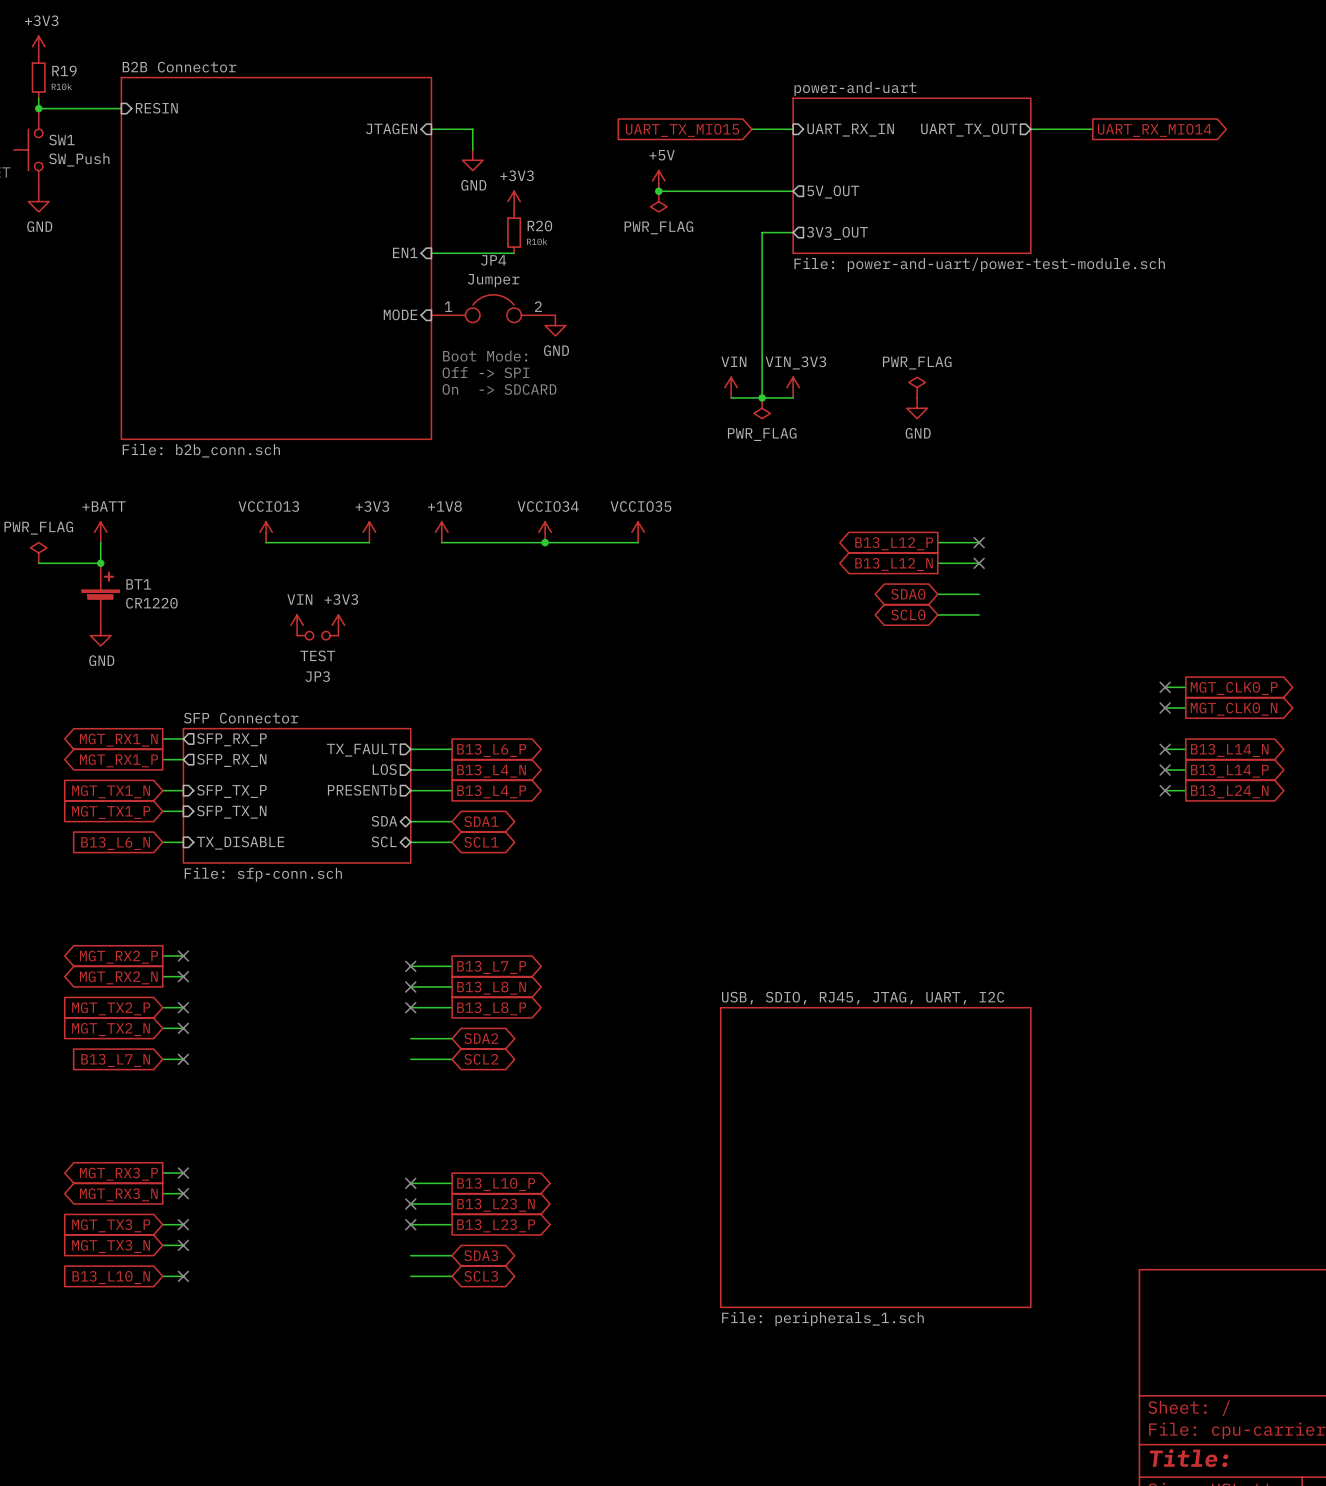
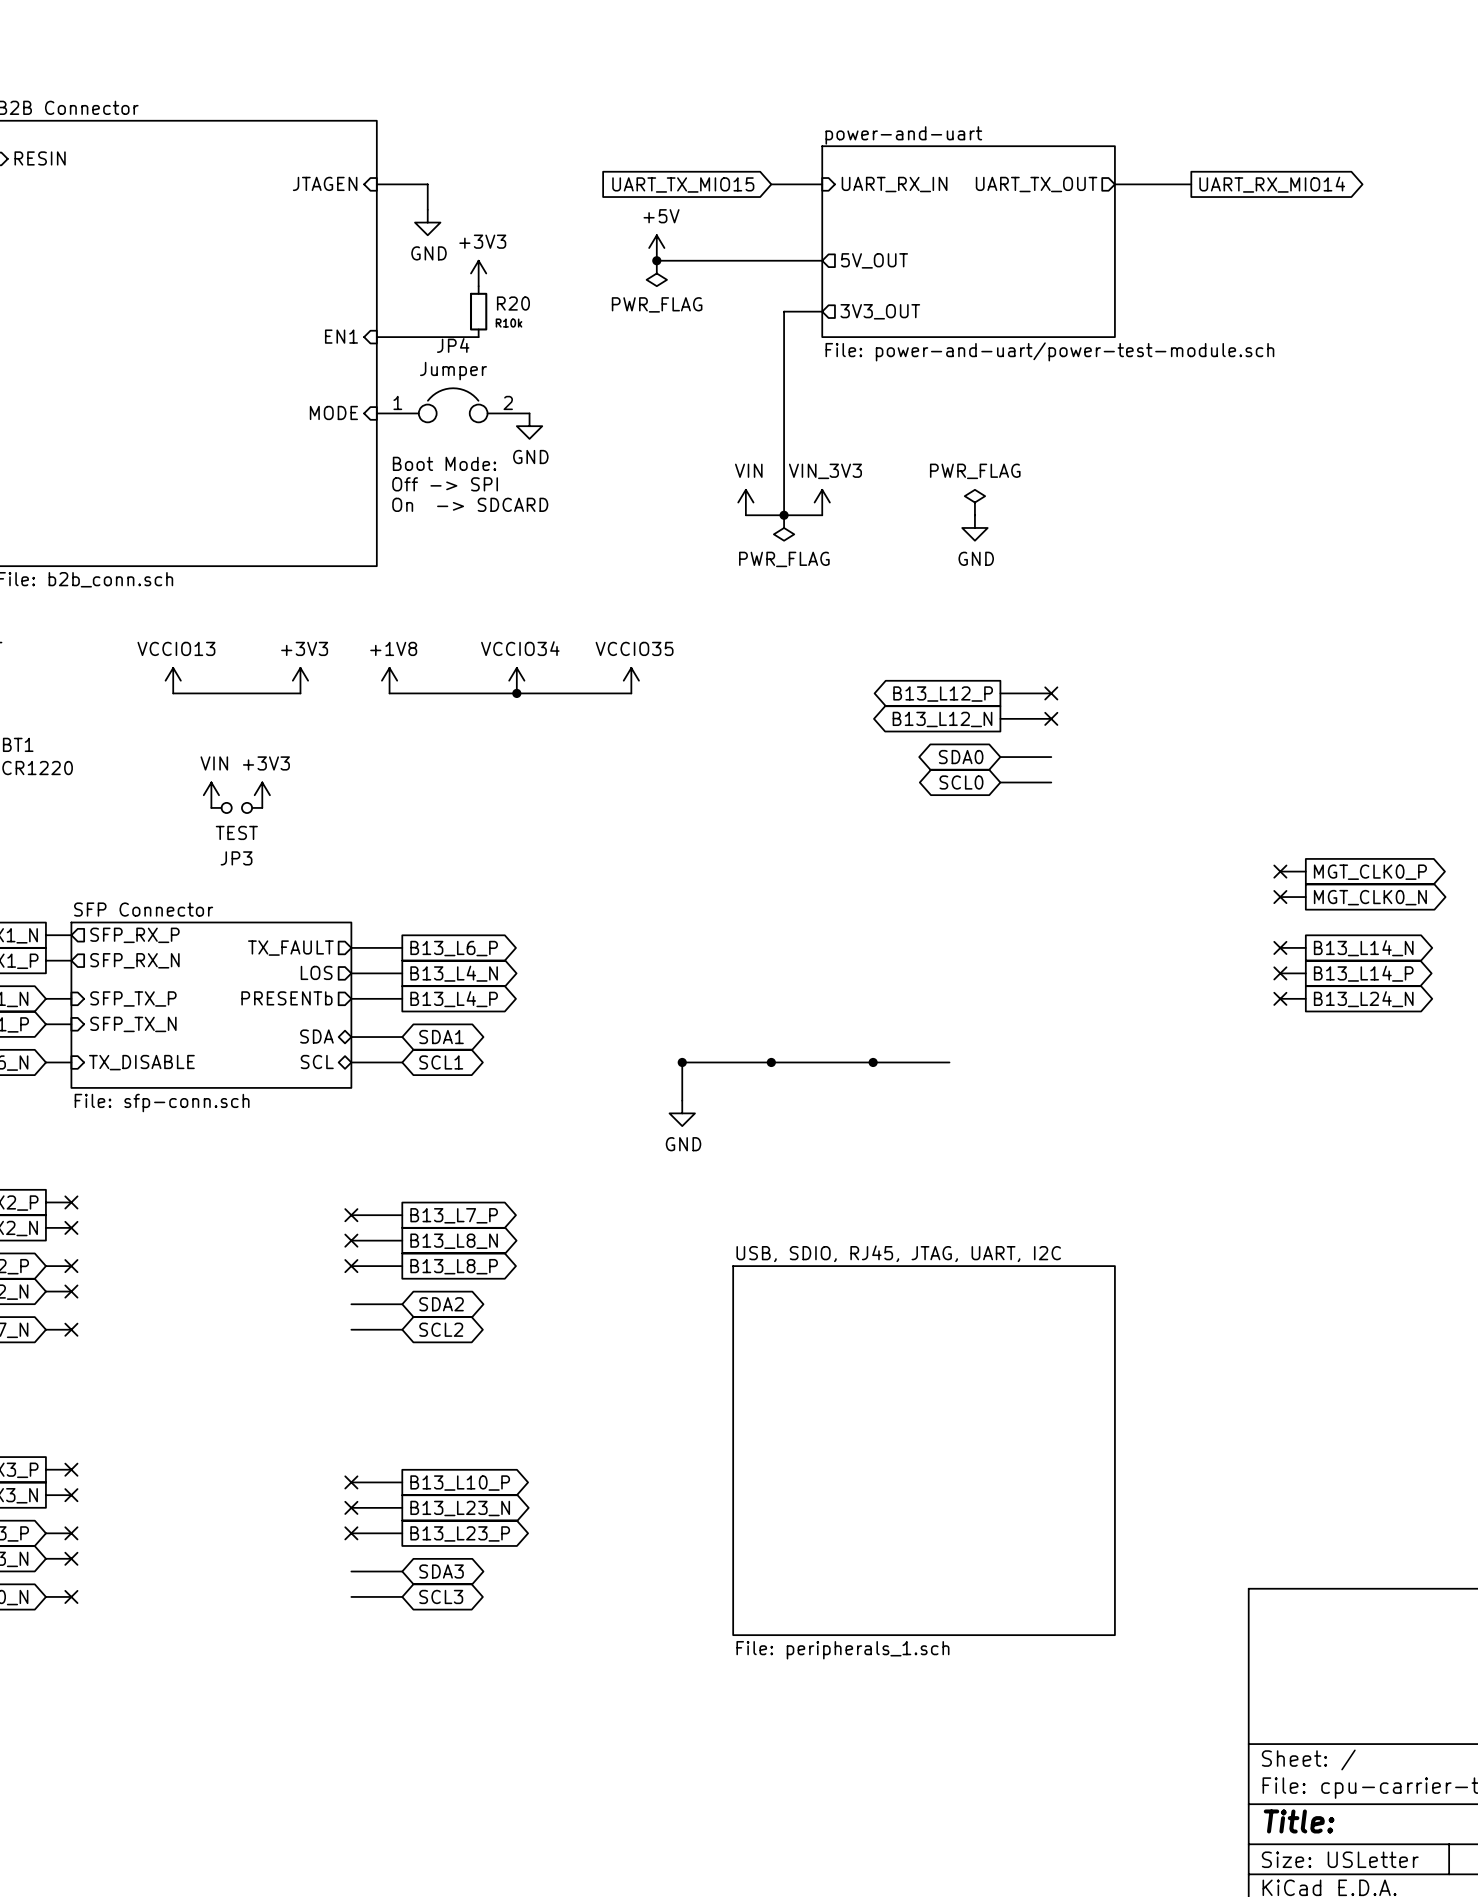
junction: none -> (682, 1062)
junction: none -> (771, 1062)
junction: none -> (873, 1062)
wire: none -> (949, 1062) (682, 1062) (682, 1100)
power symbol: none -> GND (682, 1113)

